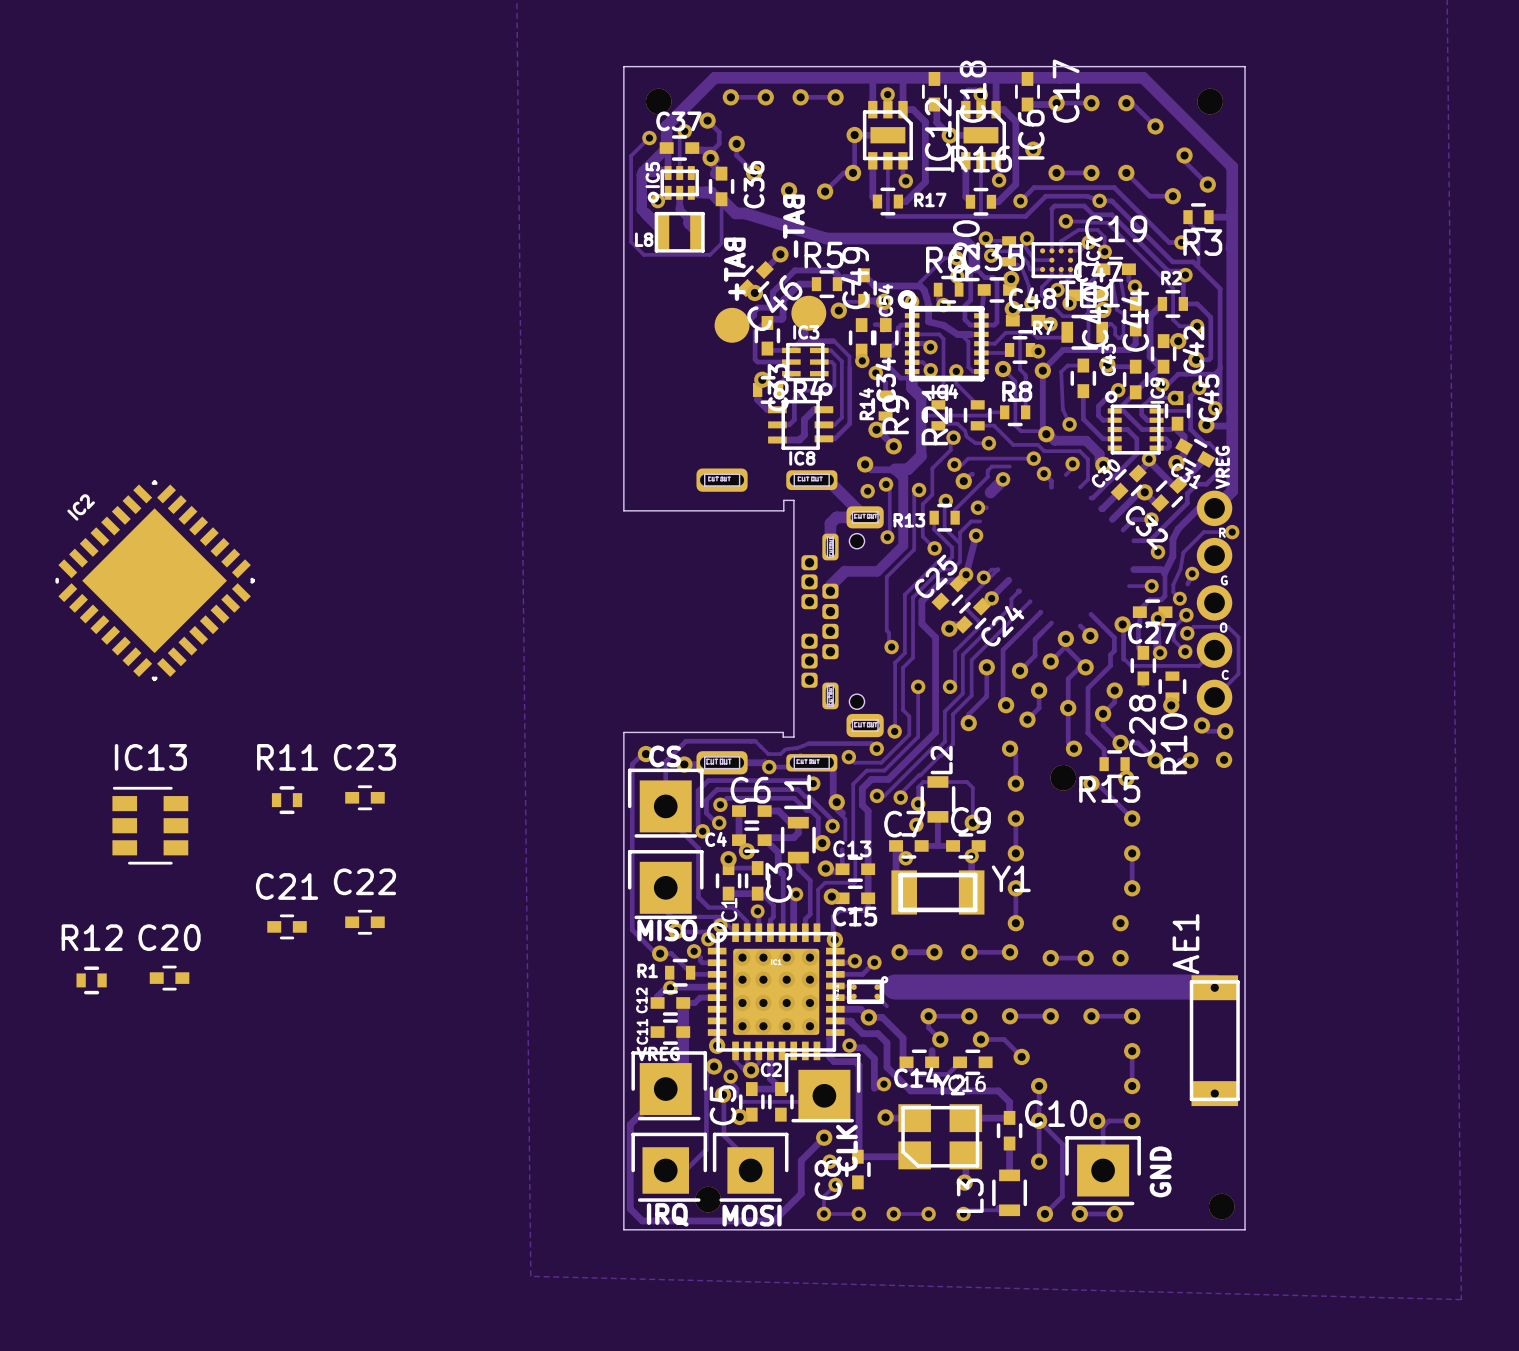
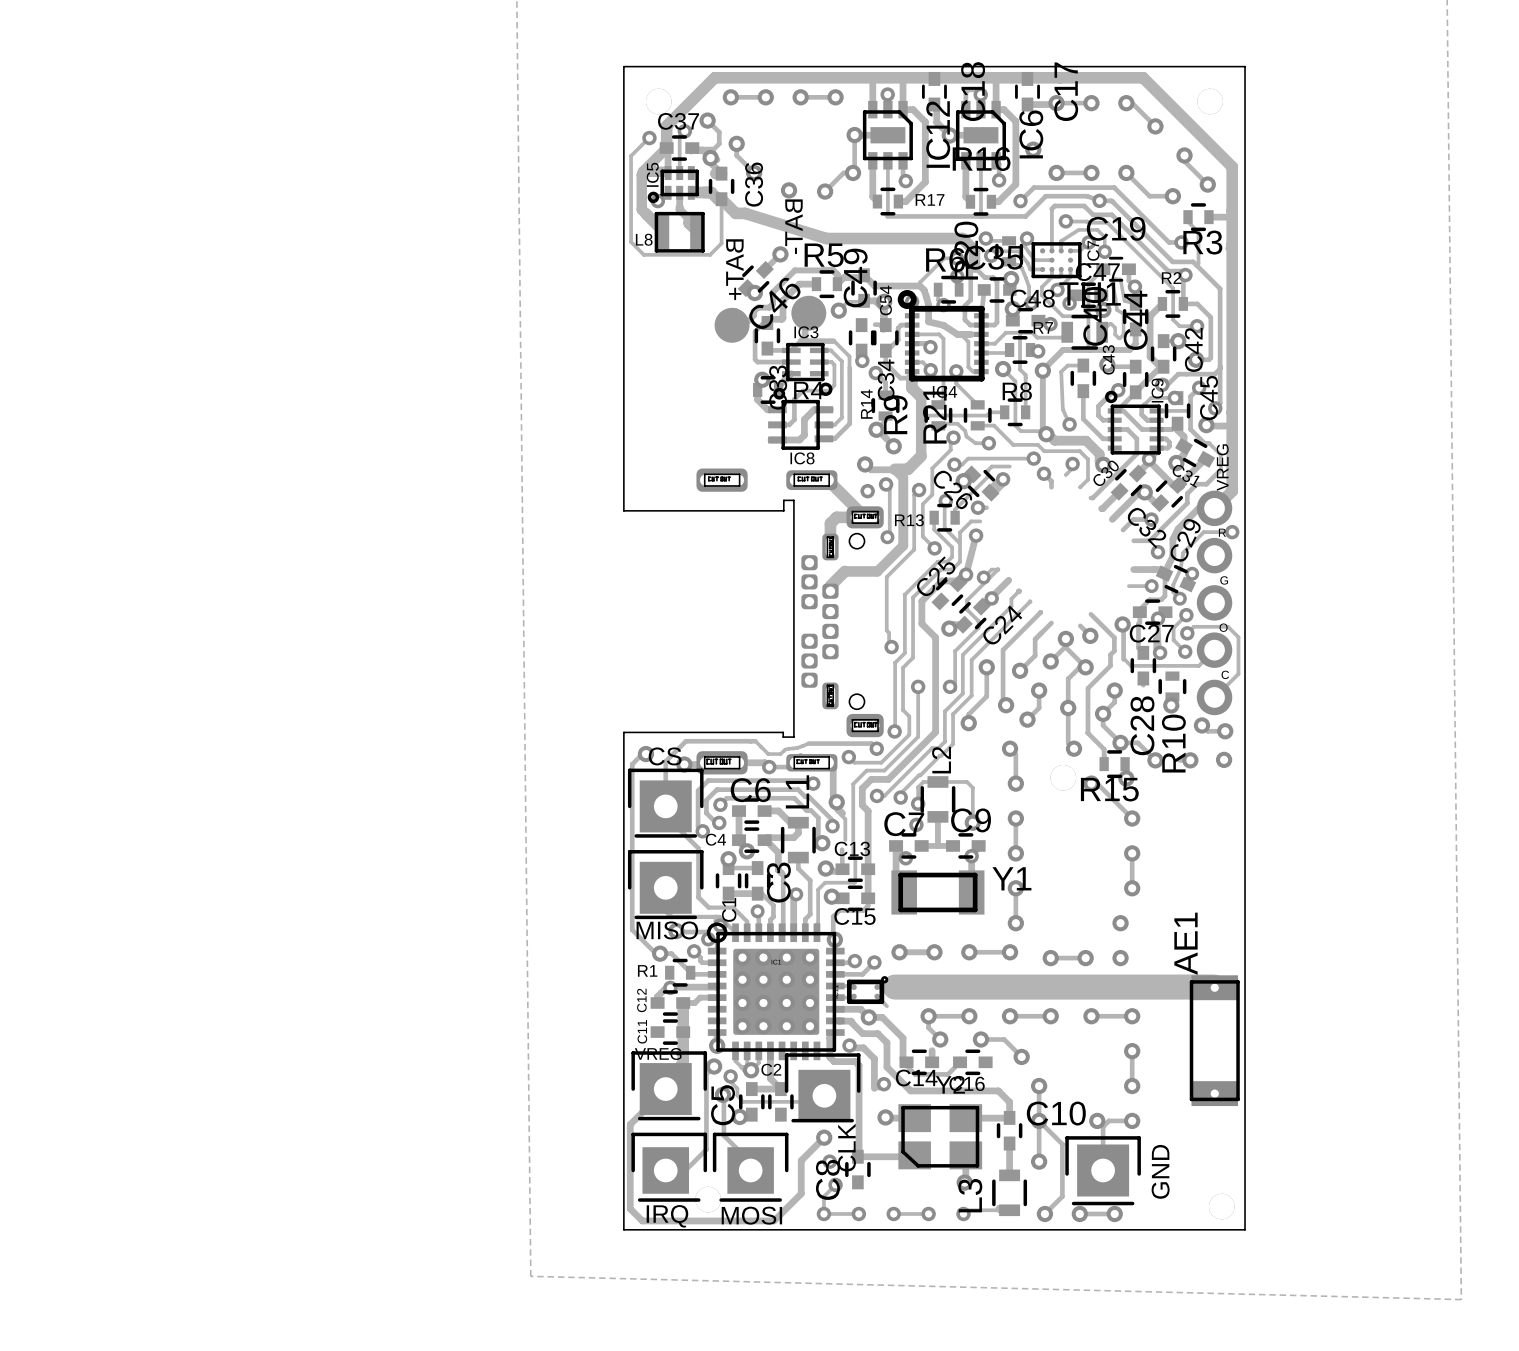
C26: none -> (981, 483)
C29: none -> (1175, 579)
IC2: (155, 580) -> none
C23: (364, 797) -> none
R11: (287, 800) -> none
IC13: (150, 825) -> none
C22: (364, 922) -> none
C21: (287, 926) -> none
C20: (169, 978) -> none
R12: (91, 980) -> none

